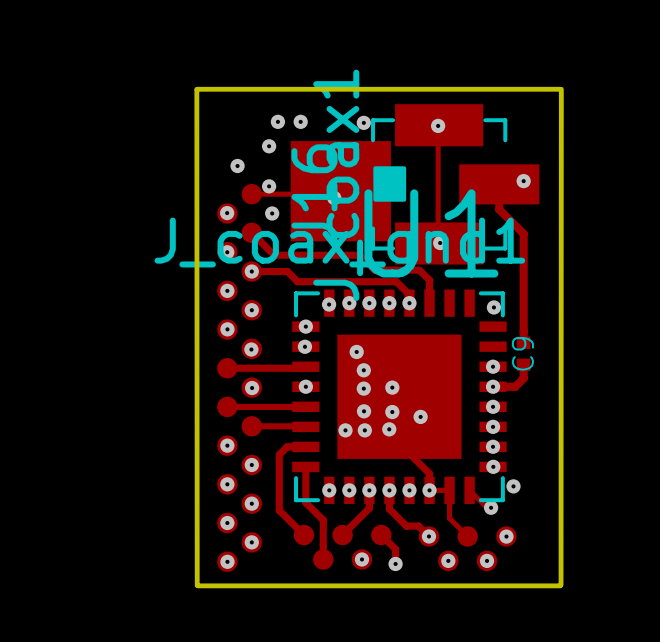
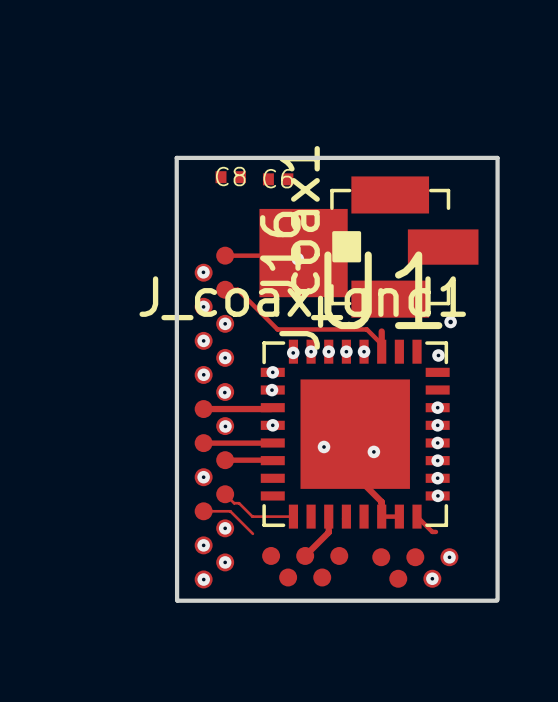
board edge: (196, 89) (560, 89) -> none
board edge: (561, 89) (561, 584) -> (176, 164) (176, 157) (497, 157) (497, 599)
C8: none -> (230, 177)
C6: none -> (278, 179)
via: (277, 121) -> none
via: (300, 121) -> none
via: (363, 122) -> none
track: (438, 125) (439, 243) -> none
via: (438, 125) -> none
via: (269, 146) -> none
via: (237, 165) -> none
via: (523, 181) -> none
track: (499, 184) (499, 209) (523, 233) (523, 342) -> none
via: (269, 186) -> none
via: (272, 213) -> none
track: (251, 232) (274, 255) (359, 255) (374, 270) (419, 270) -> (225, 289) (237, 289) (277, 329) (366, 329) (381, 344)
via: (440, 243) -> none
via: none -> (450, 321)
track: (419, 270) (429, 280) -> none
track: (251, 271) (287, 271) (297, 281) (396, 281) (409, 294) (409, 303) -> none
via: (356, 351) -> none
C9: (523, 353) -> none
track: (523, 364) (523, 378) (515, 386) (493, 386) -> none
via: (363, 370) -> none
via: (392, 387) -> none
via: (363, 388) -> none
via: (392, 412) -> none
via: (389, 429) -> none
via: (345, 430) -> none
via: (364, 430) -> none
track: (305, 446) (287, 446) (279, 454) (279, 510) (303, 535) -> none
track: none -> (225, 494) (234, 503) (239, 503) (252, 516) (293, 516)
via: (251, 464) -> none
track: (305, 466) (305, 502) (323, 520) (323, 559) -> none
track: none -> (203, 511) (230, 511) (252, 533)
via: (227, 484) -> none
via: (513, 486) -> none
via: (329, 490) -> none
via: (349, 490) -> none
via: (369, 490) -> none
track: (389, 490) (389, 509) (406, 526) (418, 526) (428, 536) -> none
via: (389, 490) -> none
via: (409, 490) -> none
via: (429, 490) -> none
track: (449, 490) (449, 518) (467, 536) -> none
via: (491, 507) -> none
track: (381, 535) (395, 549) (395, 563) -> none
via: (428, 536) -> none
via: (361, 559) -> none
via: (448, 560) -> none
via: (395, 563) -> none

